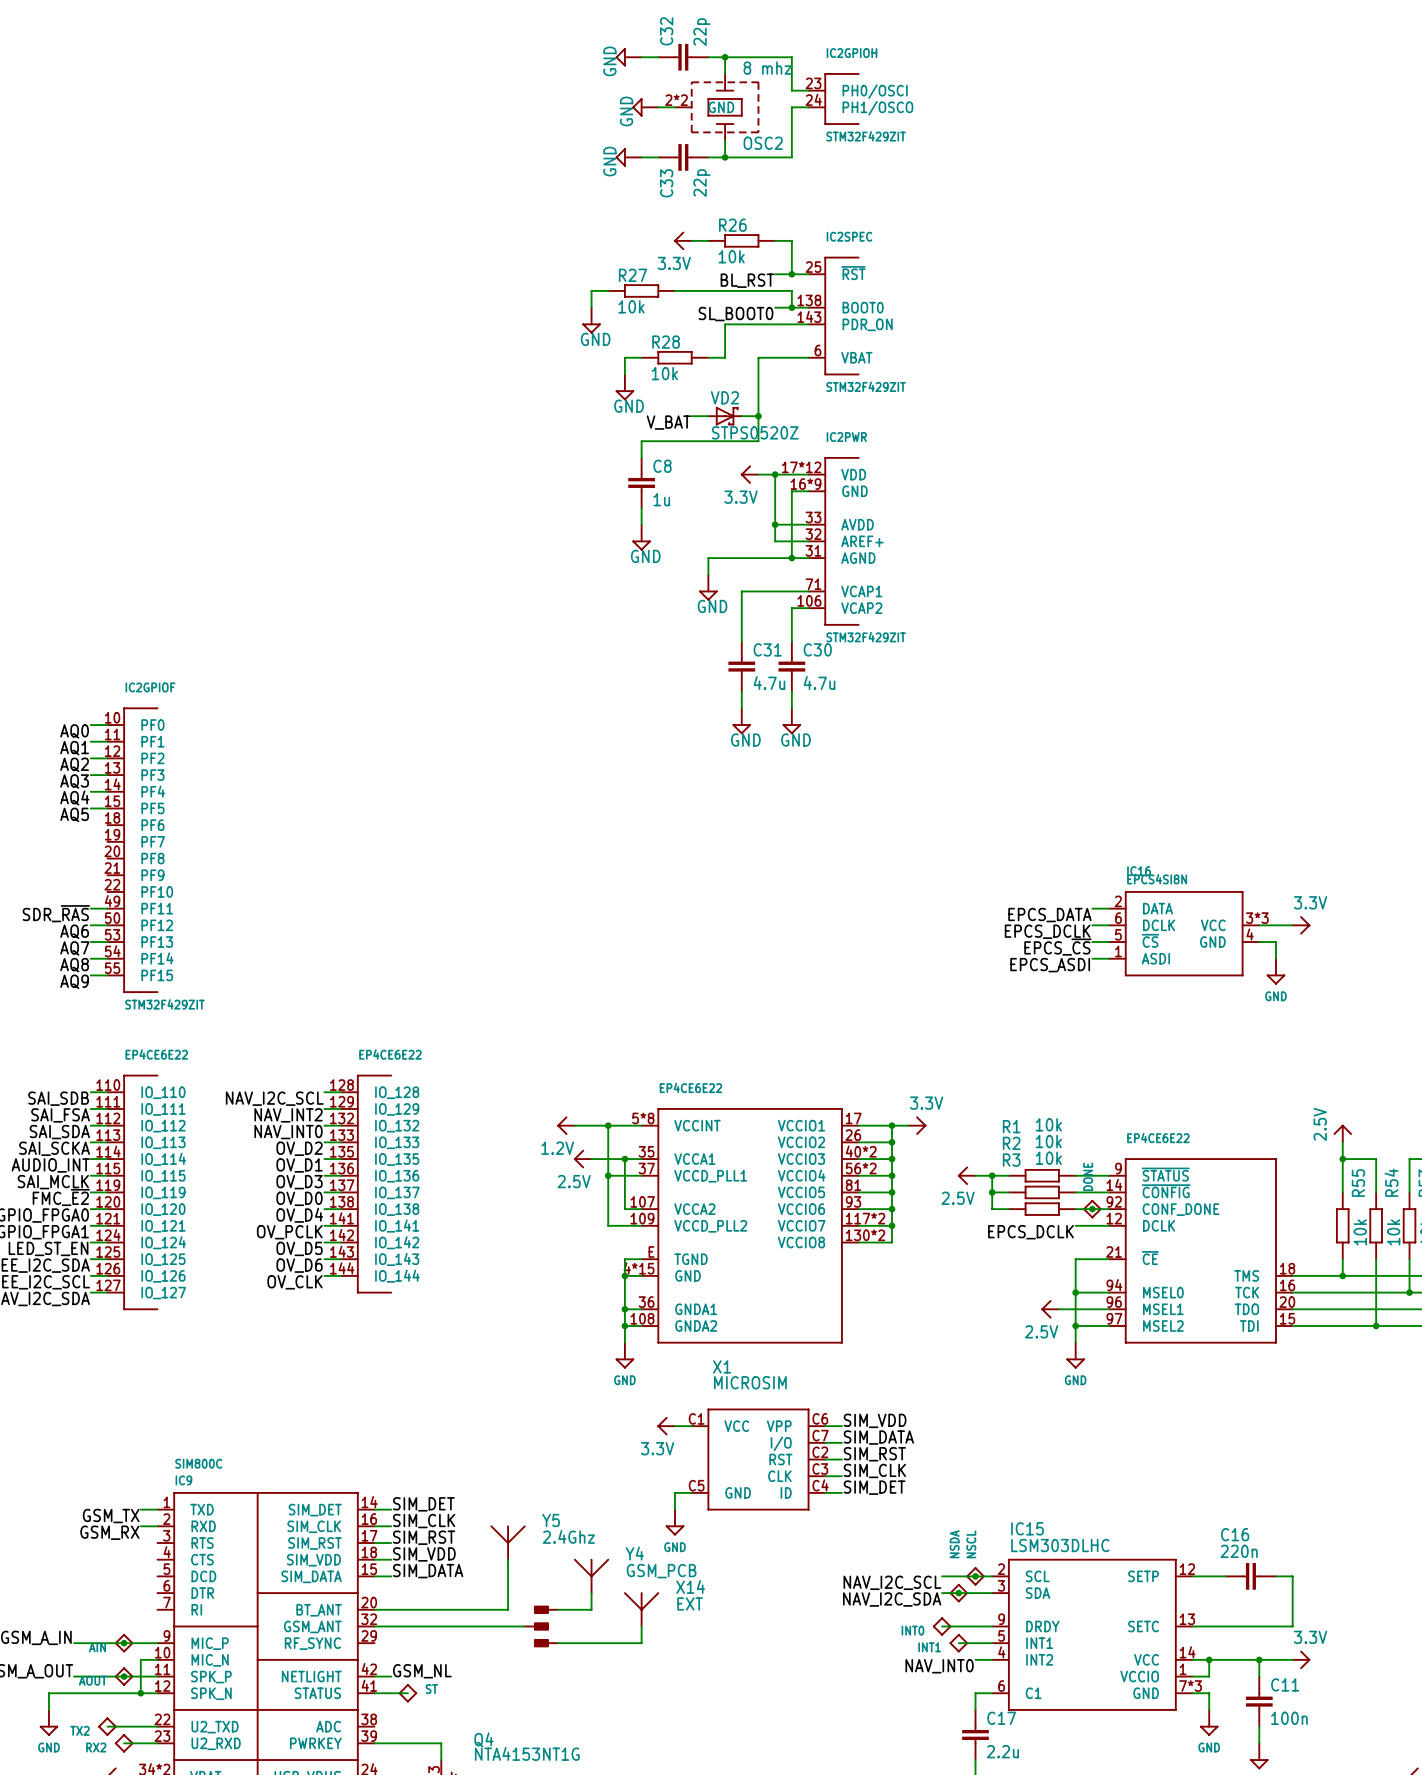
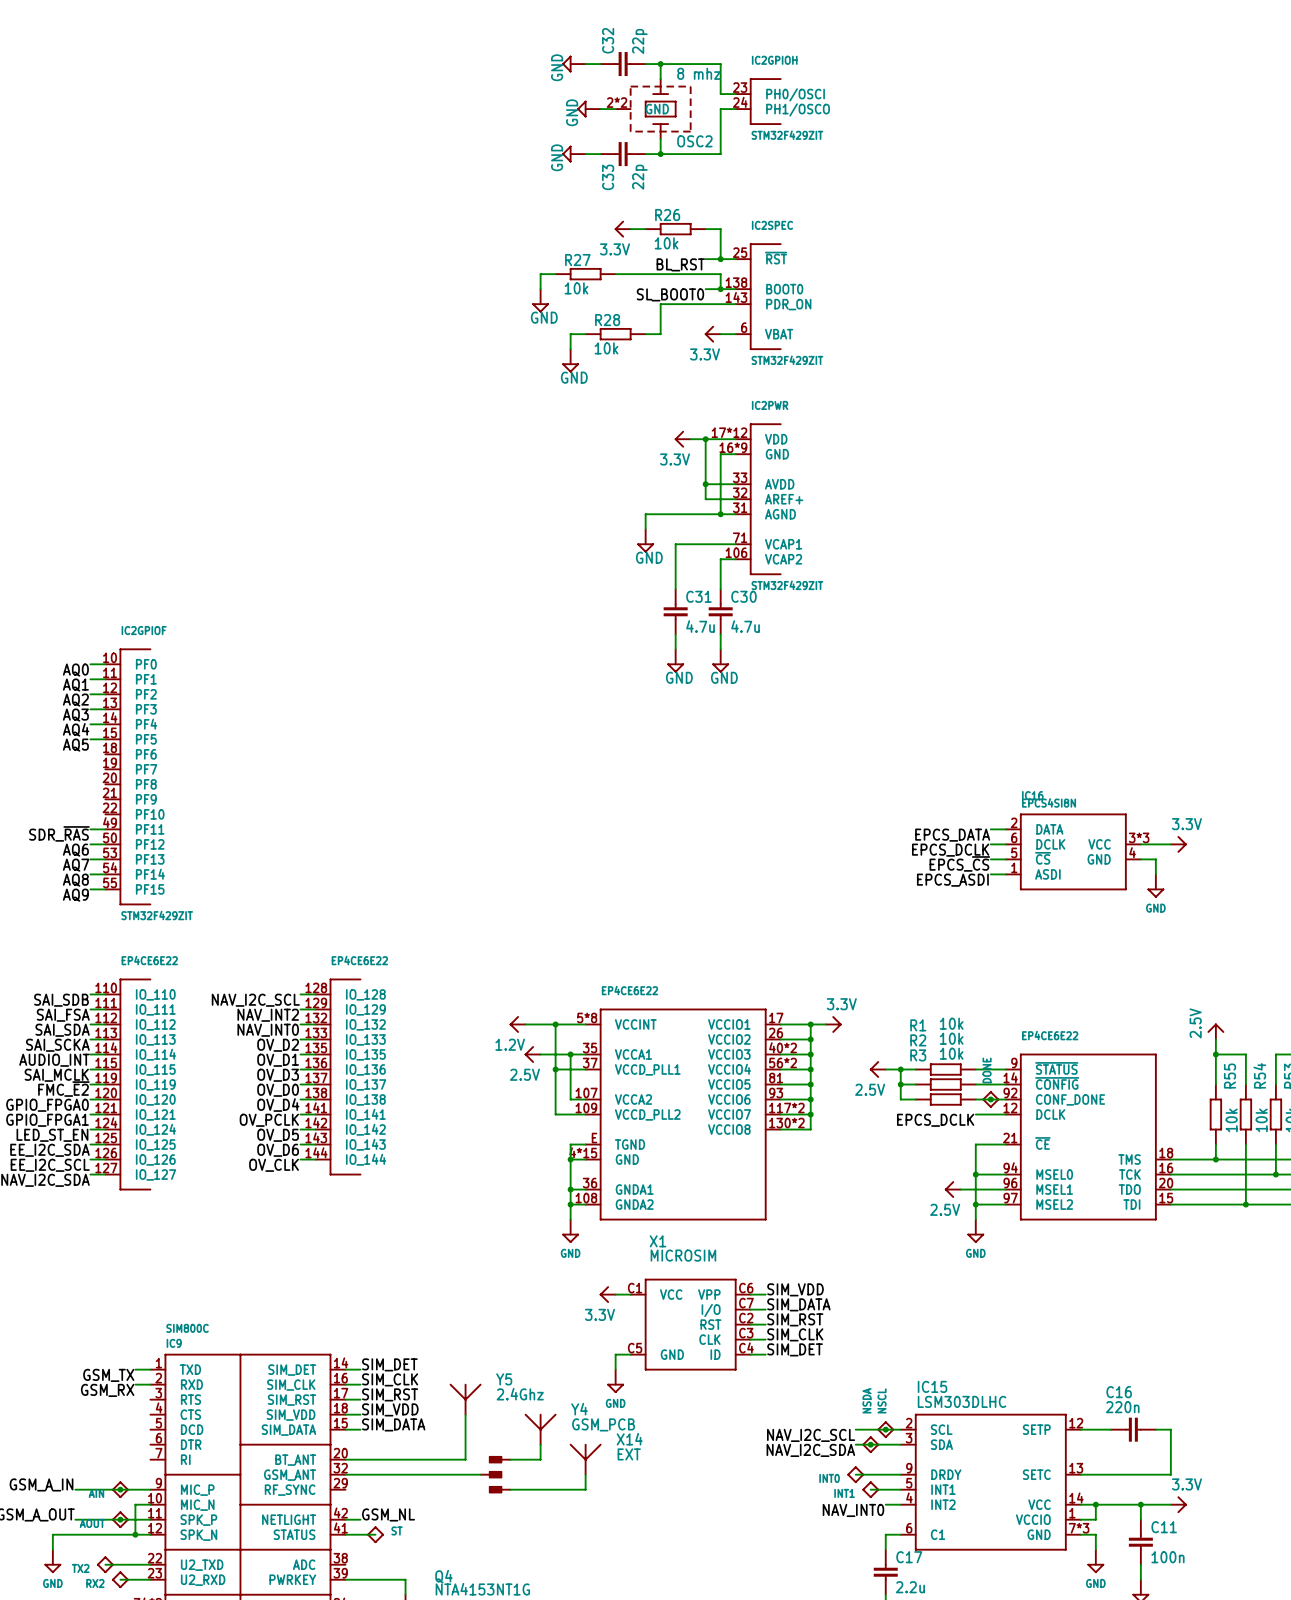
power symbol: none -> 3.3V (713, 334)
wire: (791, 357) (758, 357) (758, 441) (641, 441) (641, 457) -> none
wire: (691, 416) (708, 416) -> none
VD2: STPS0520Z (725, 416) -> none
wire: (741, 416) (758, 416) -> none
junction: (758, 416) -> none
label: V_BAT (668, 422) -> none
C8: 1u (641, 482) -> none
wire: (641, 507) (641, 524) -> none
power symbol: GND (641, 537) -> none

